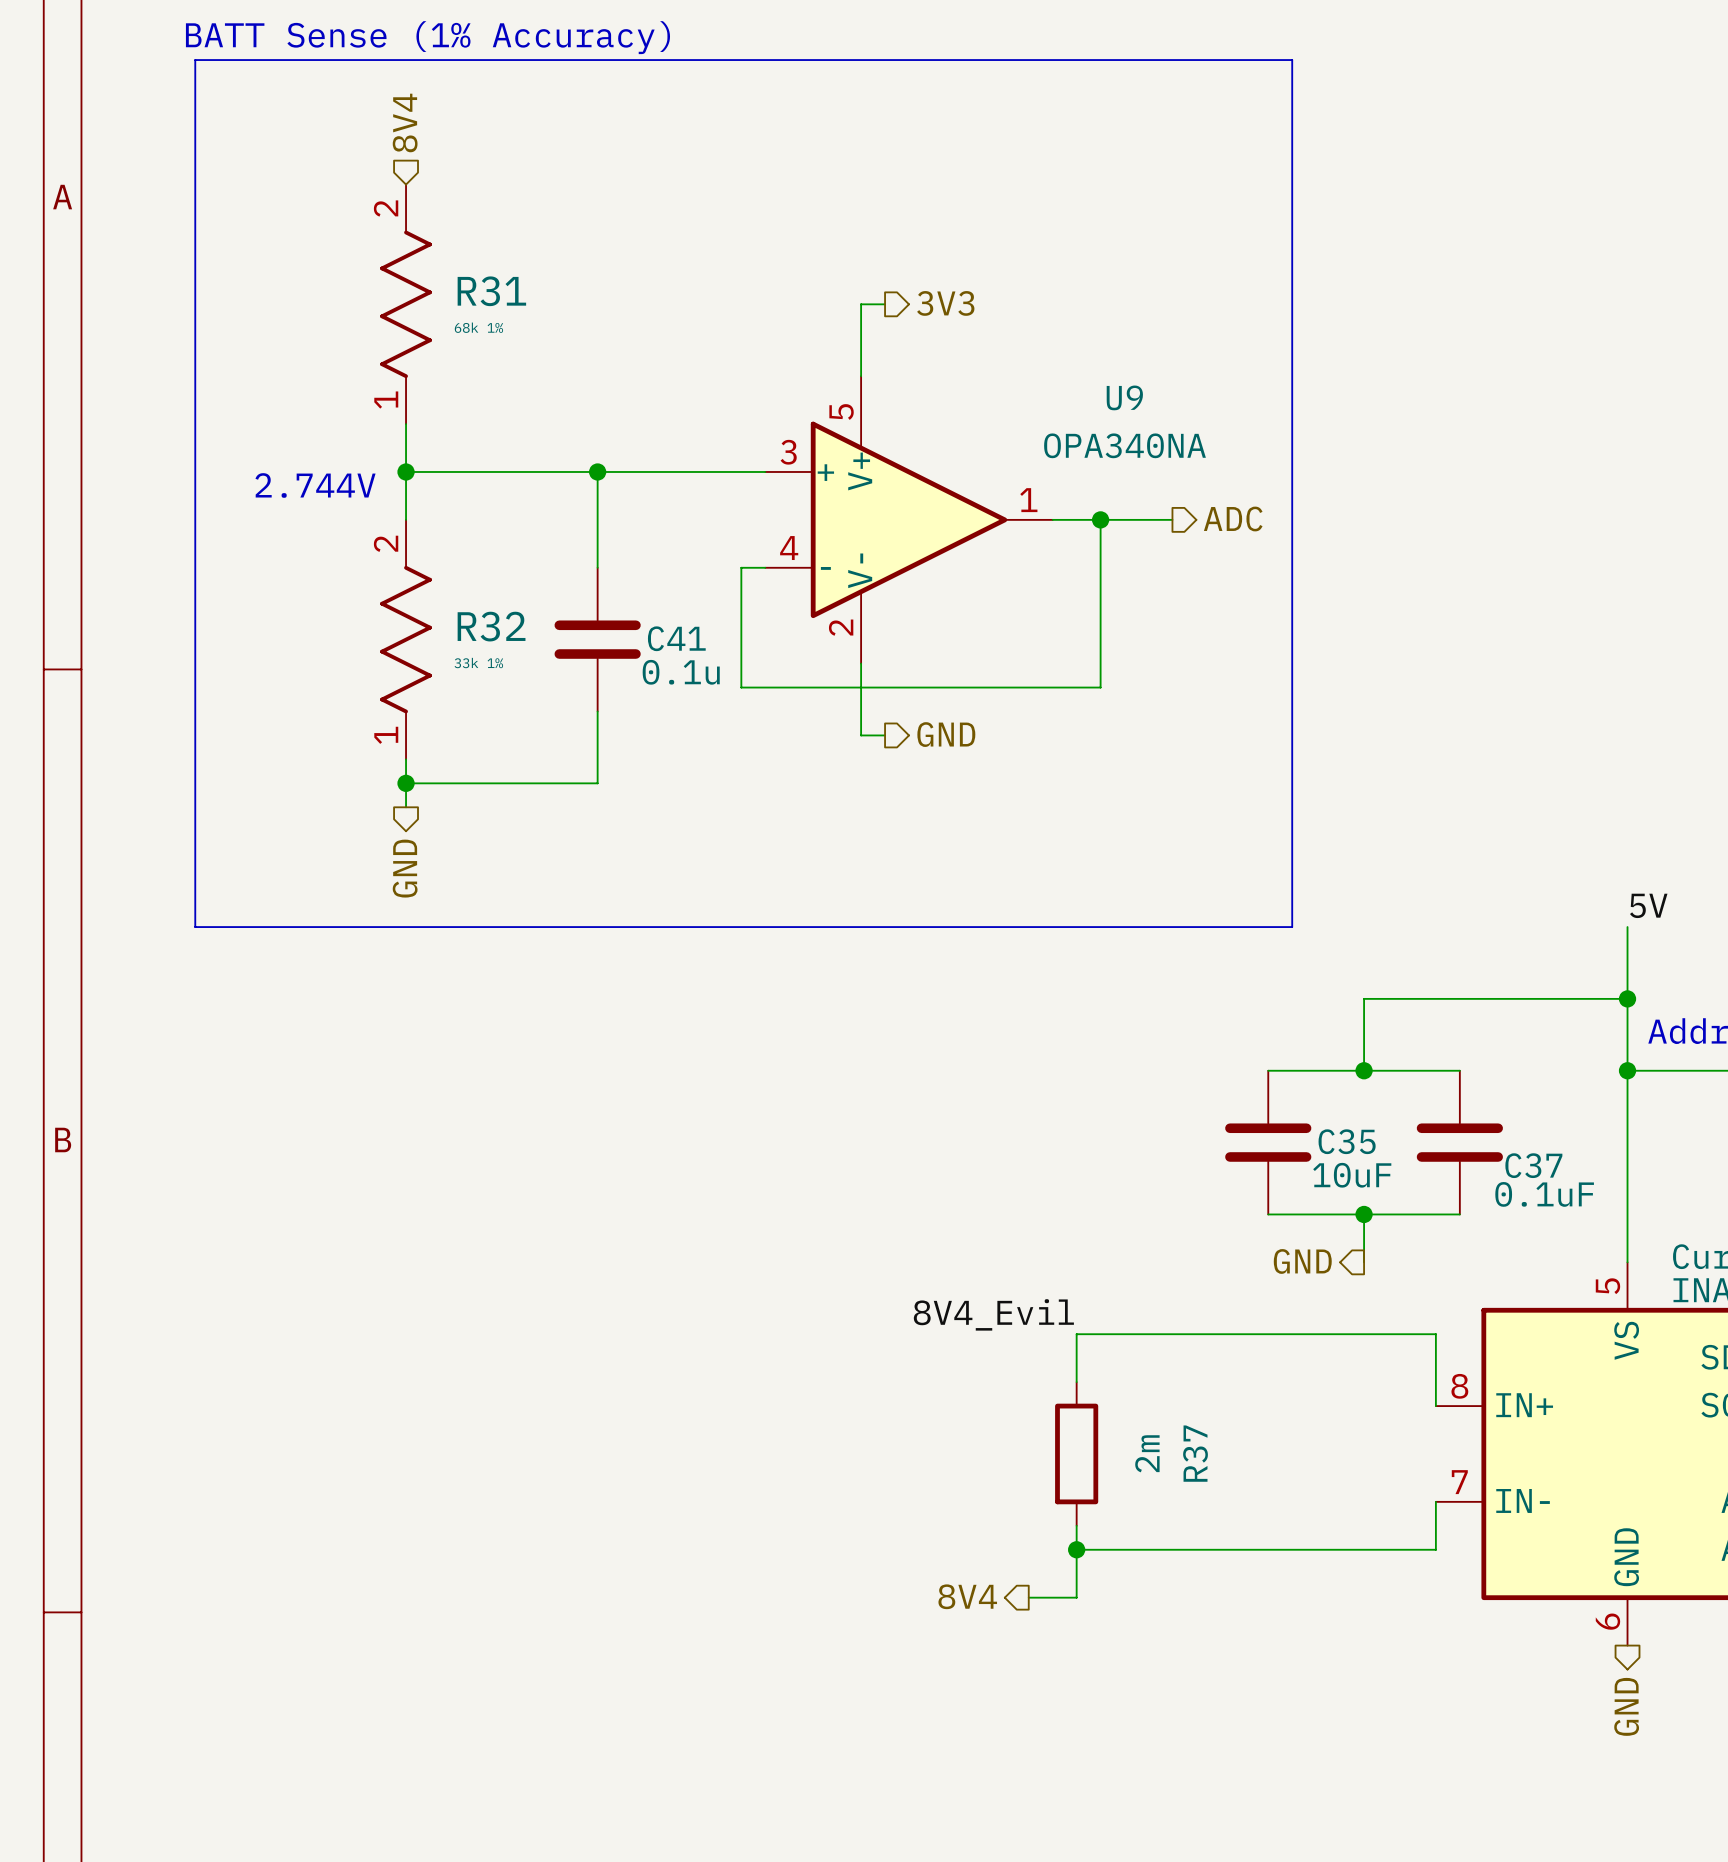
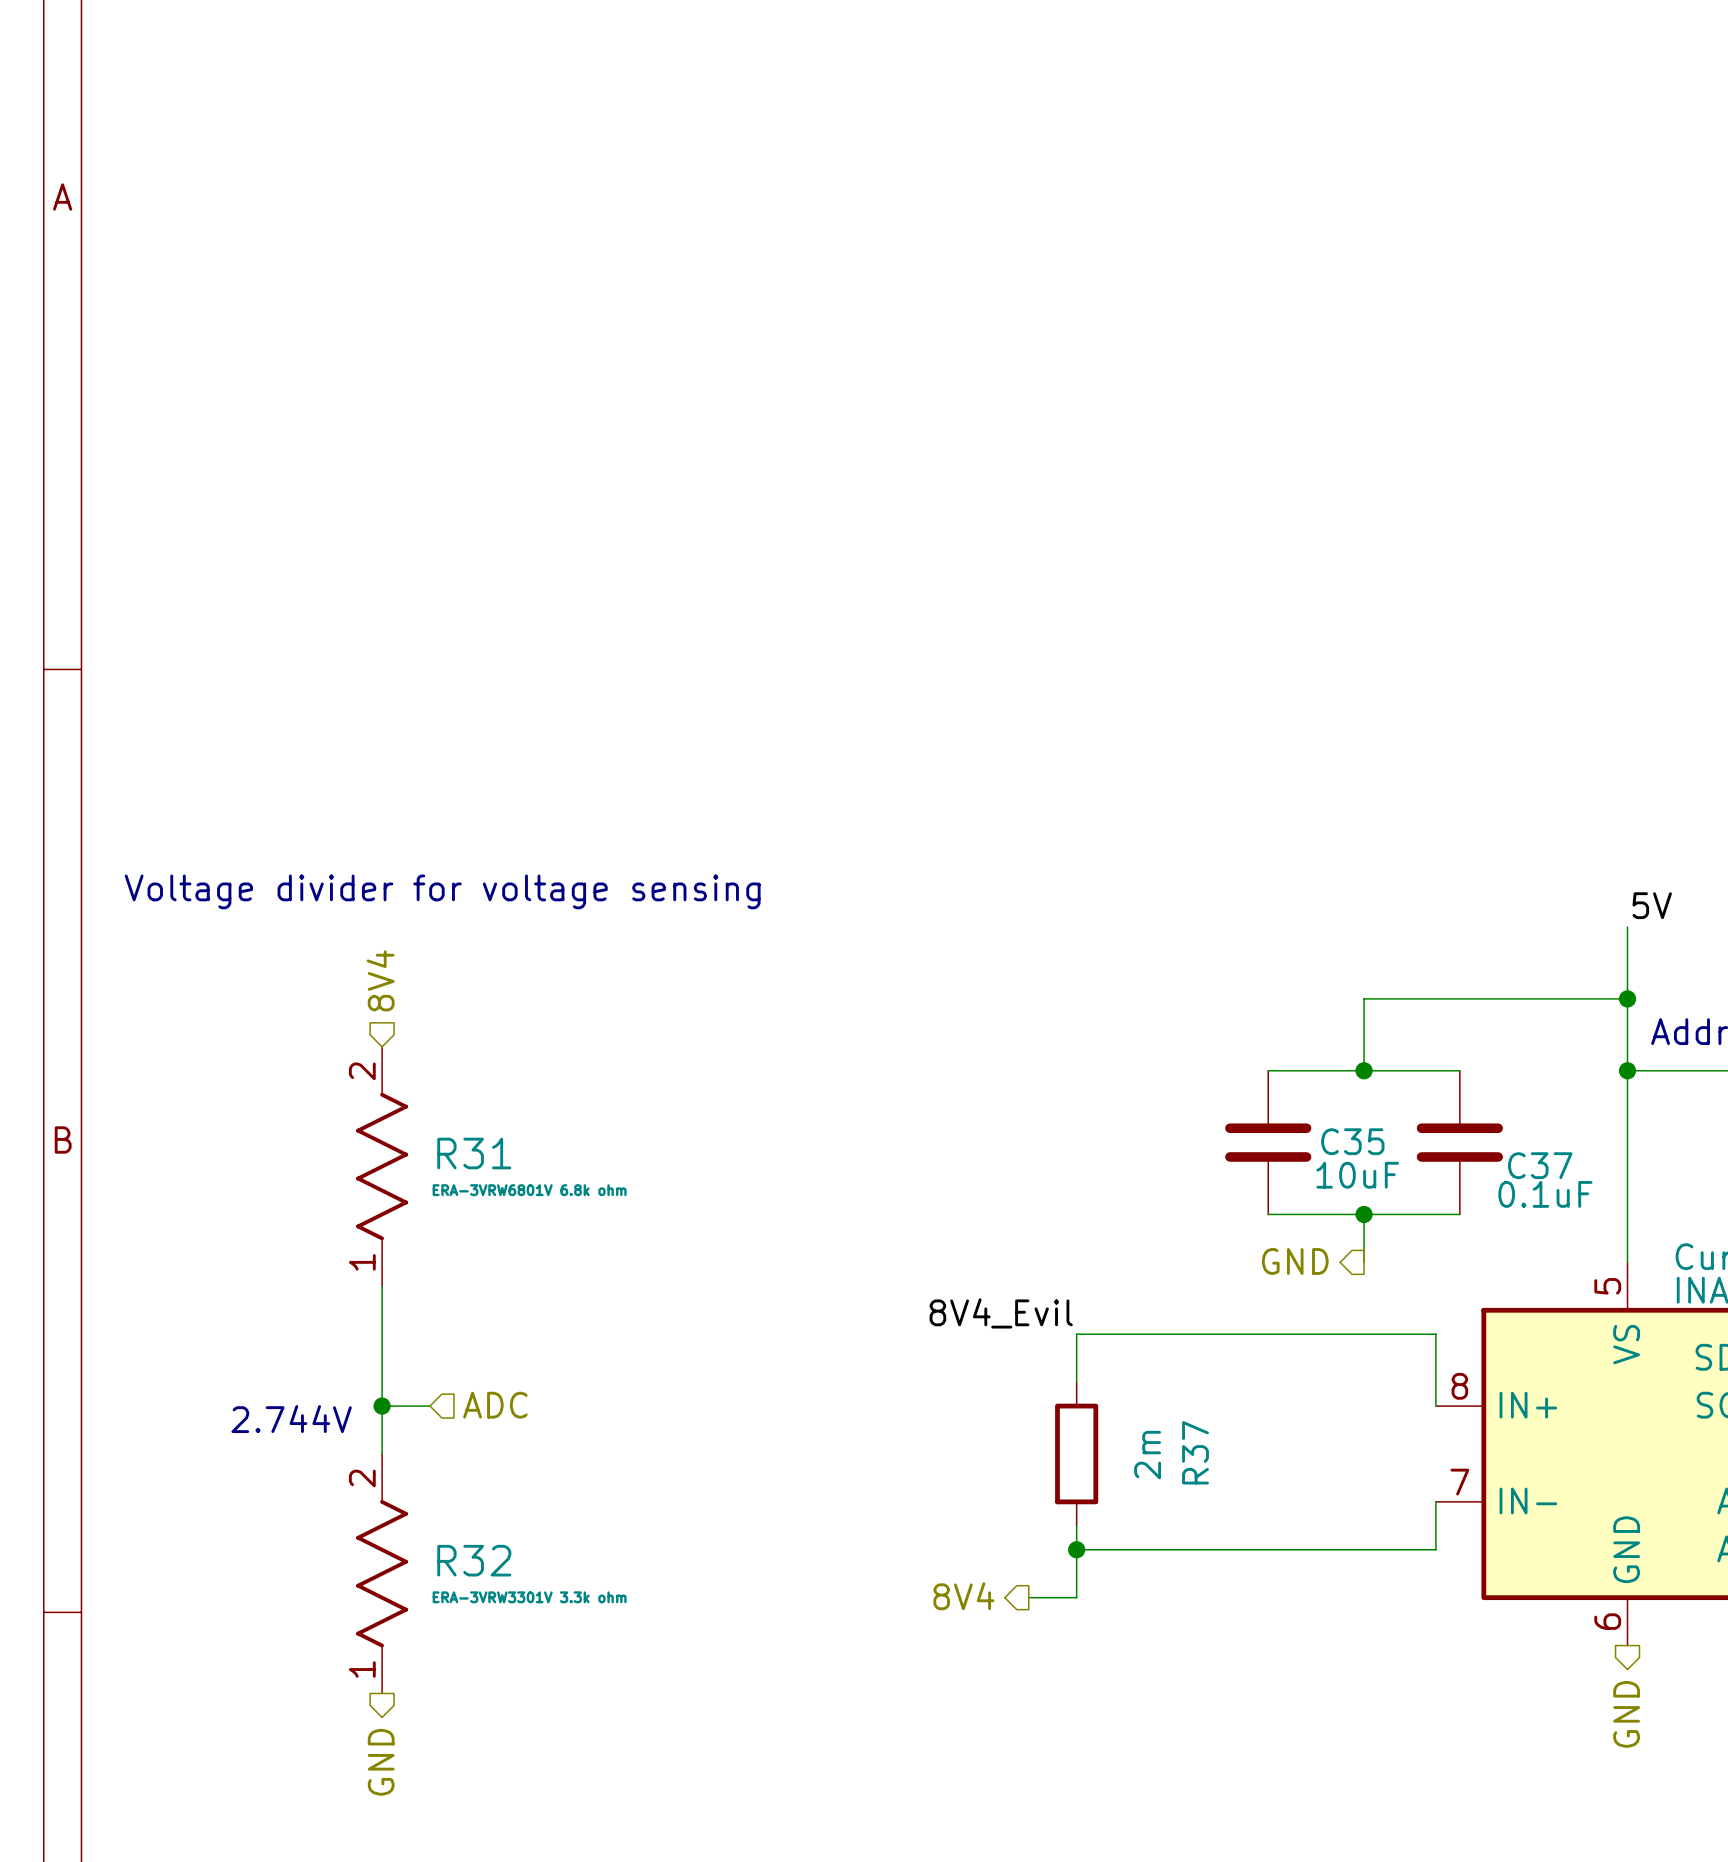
text: BATT Sense (1% Accuracy) (427, 37) -> none
line: (195, 60) (195, 927) (1292, 927) (1292, 60) (195, 60) -> none
hierarchical label: 8V4 (405, 122) -> none
hierarchical label: 3V3 (945, 303) -> none
R31 position: (406, 304) -> (382, 1166)
wire: (885, 304) (861, 304) (861, 376) -> none
R31 value: 68k 1% (478, 327) -> ERA-3VRW6801V 6.8k ohm (529, 1190)
wire: (406, 424) (406, 519) -> none
wire: (406, 471) (765, 471) -> none
junction: (406, 471) -> none
wire: (597, 471) (597, 567) -> none
junction: (597, 471) -> none
text: 2.744V (315, 485) -> none
hierarchical label: ADC (1233, 518) -> none
U9: OPA340NA (908, 519) -> none
wire: (1052, 519) (1172, 519) -> none
wire: (1100, 519) (1100, 687) (741, 687) (741, 567) (765, 567) -> none
junction: (1100, 519) -> none
R32 position: (406, 639) -> (382, 1573)
C41: 0.1u (597, 639) -> none
R32 value: 33k 1% (478, 663) -> ERA-3VRW3301V 3.3k ohm (529, 1597)
wire: (861, 663) (861, 735) (885, 735) -> none
wire: (597, 711) (597, 783) (406, 783) -> none
hierarchical label: GND (946, 734) -> none
wire: (406, 759) (406, 807) -> none
junction: (406, 783) -> none
hierarchical label: GND (405, 868) -> none
text: none -> Voltage divider for voltage sensing (442, 891)
hierarchical label: none -> 8V4 (380, 980)
wire: none -> (382, 1286) (382, 1453)
hierarchical label: none -> ADC (495, 1405)
wire: none -> (382, 1406) (429, 1406)
junction: none -> (382, 1406)
text: none -> 2.744V (291, 1419)
hierarchical label: none -> GND (381, 1762)

